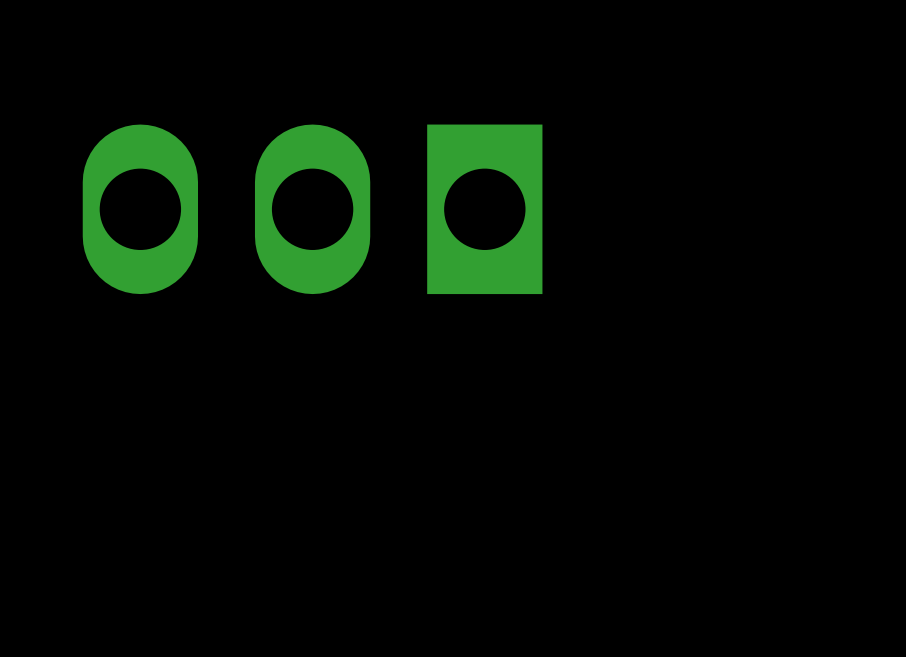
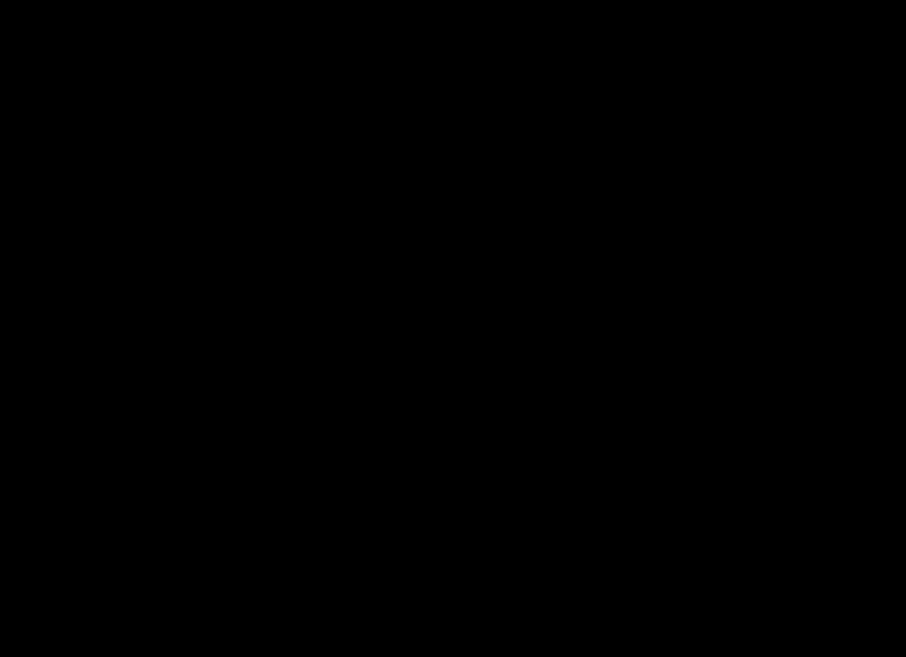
part: (312, 209) -> none

